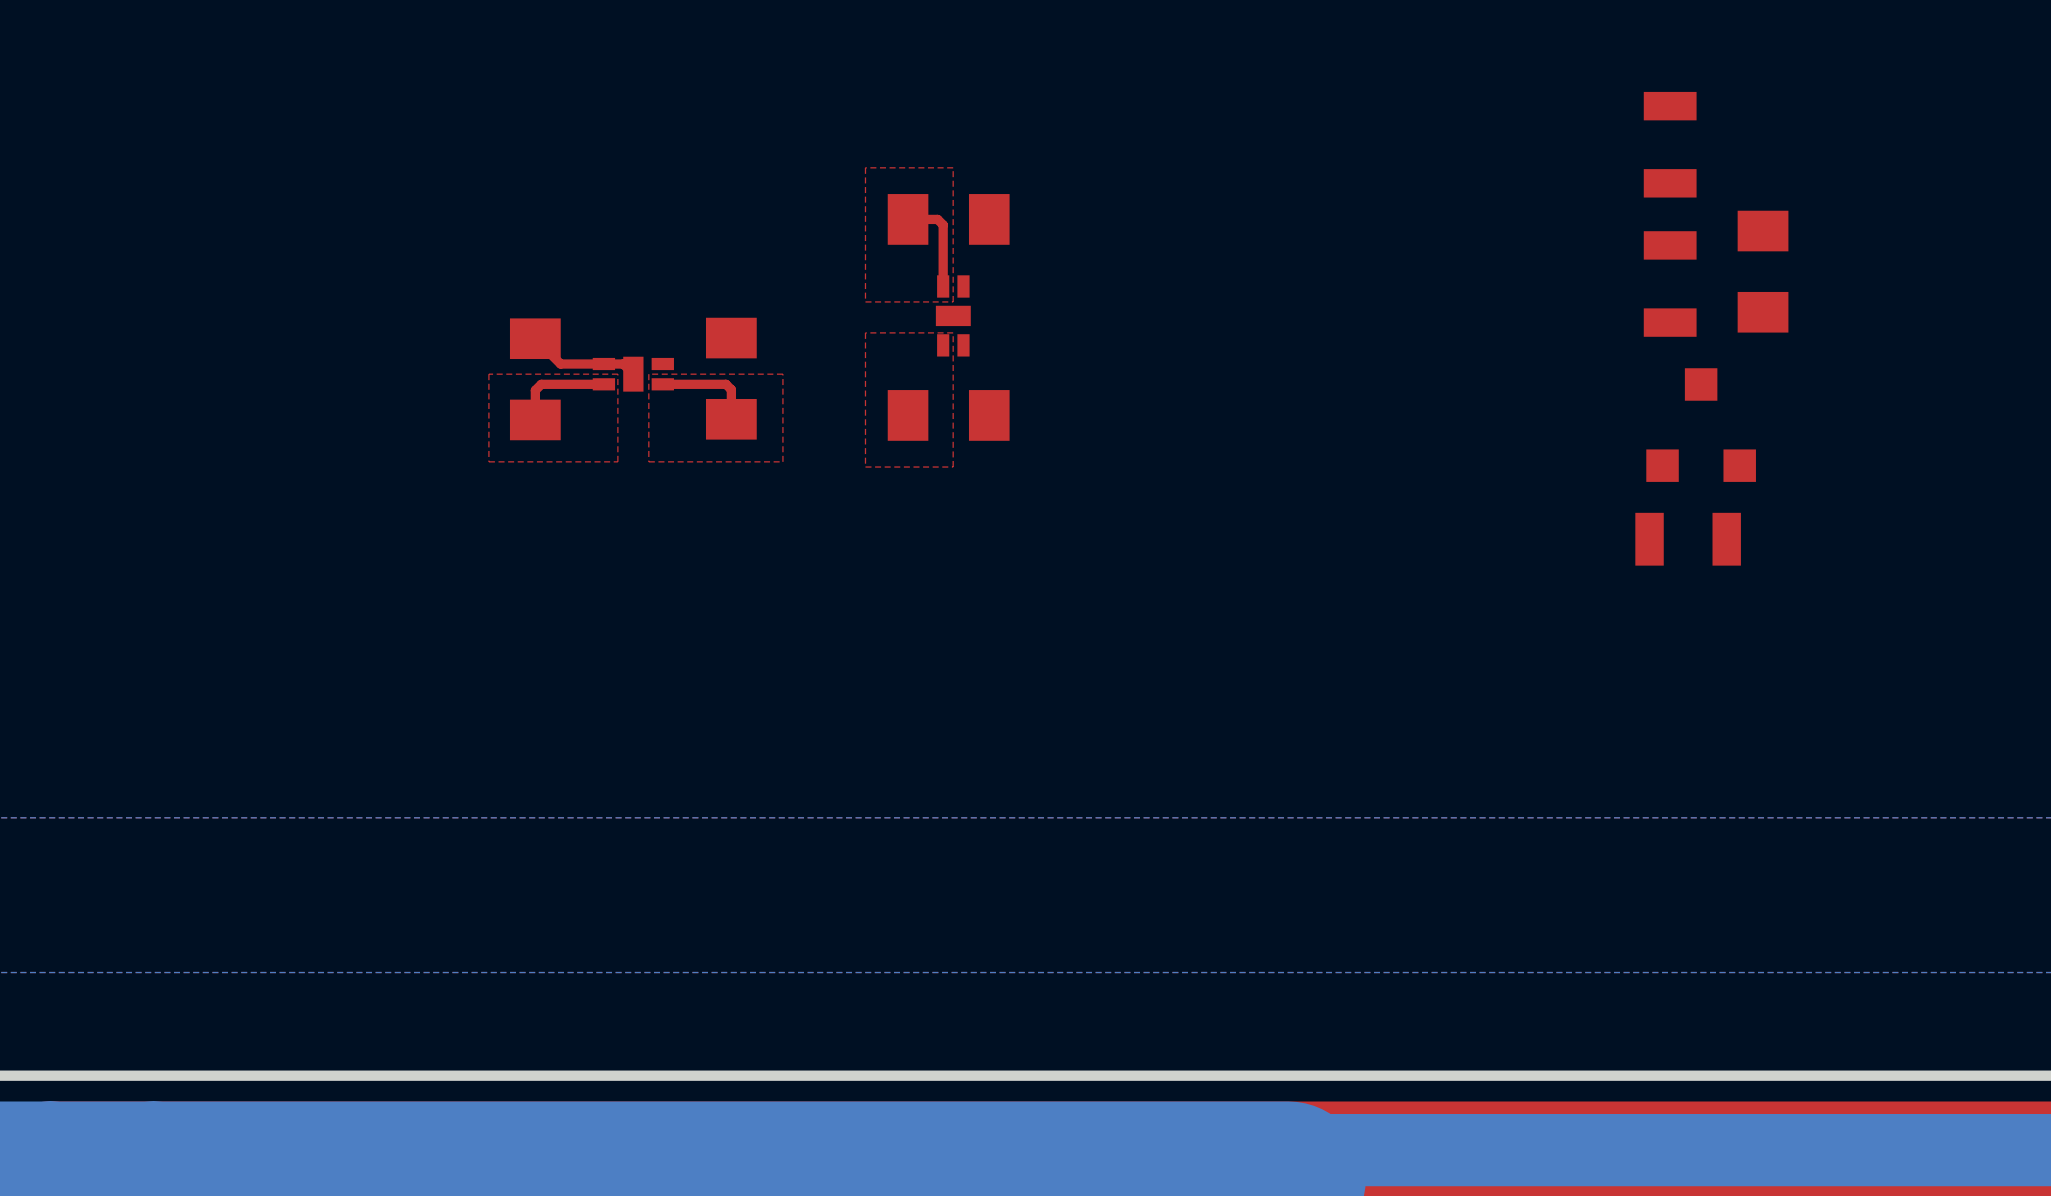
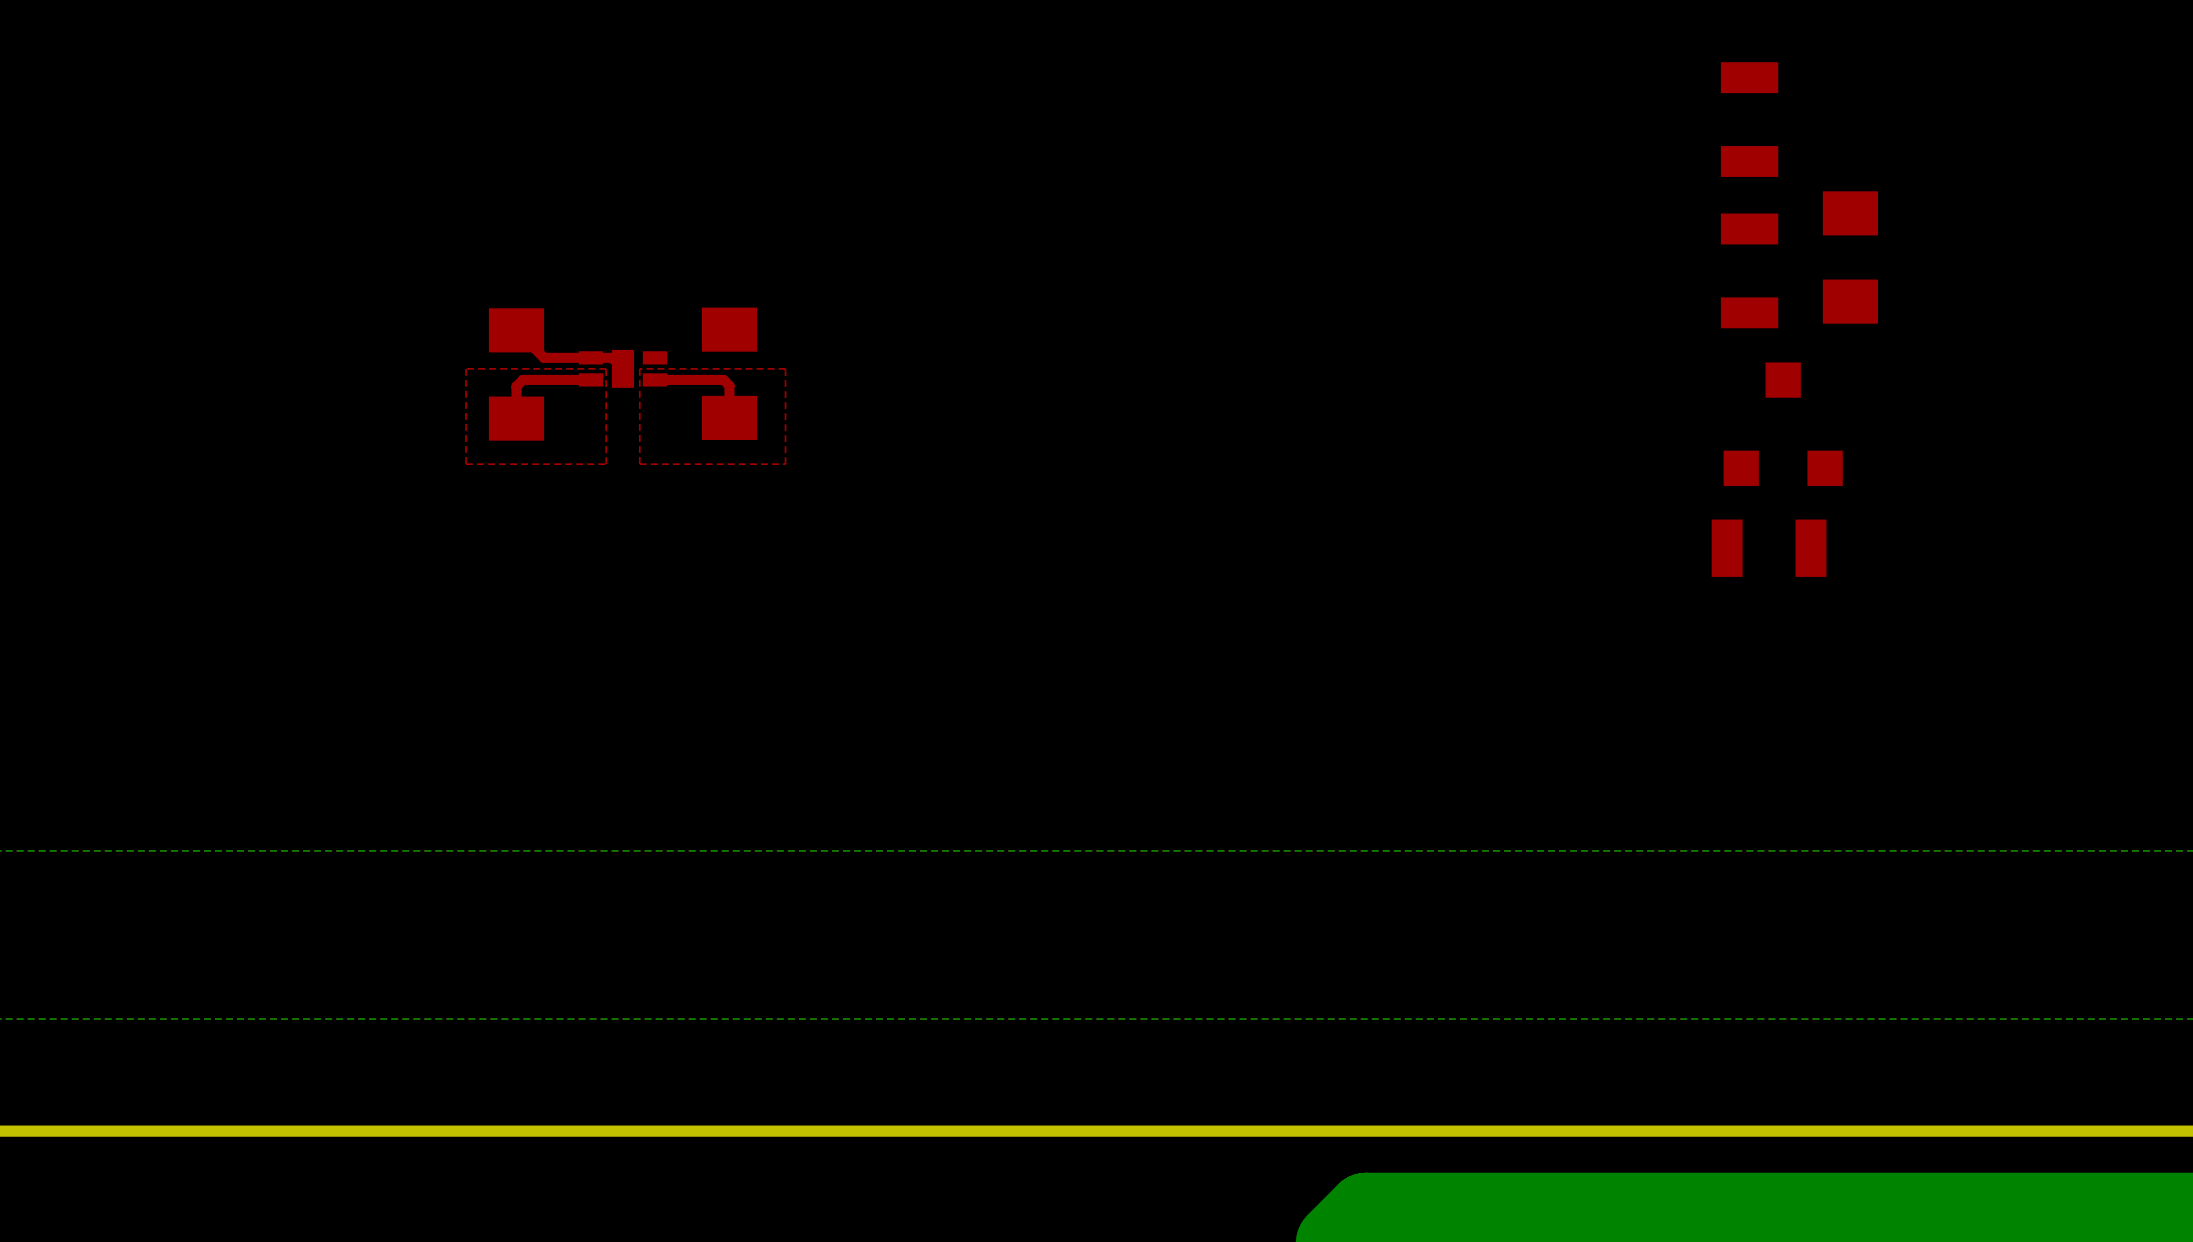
top zone outline: (953, 167) (953, 301) (865, 301) (865, 167) (953, 167) -> none
top track: (908, 219) (937, 219) (943, 224) (943, 286) -> none
part: (948, 219) -> none
part: (953, 315) -> none
top zone outline: (953, 332) (865, 332) (865, 467) (953, 467) (953, 332) -> none
part: (948, 415) -> none

